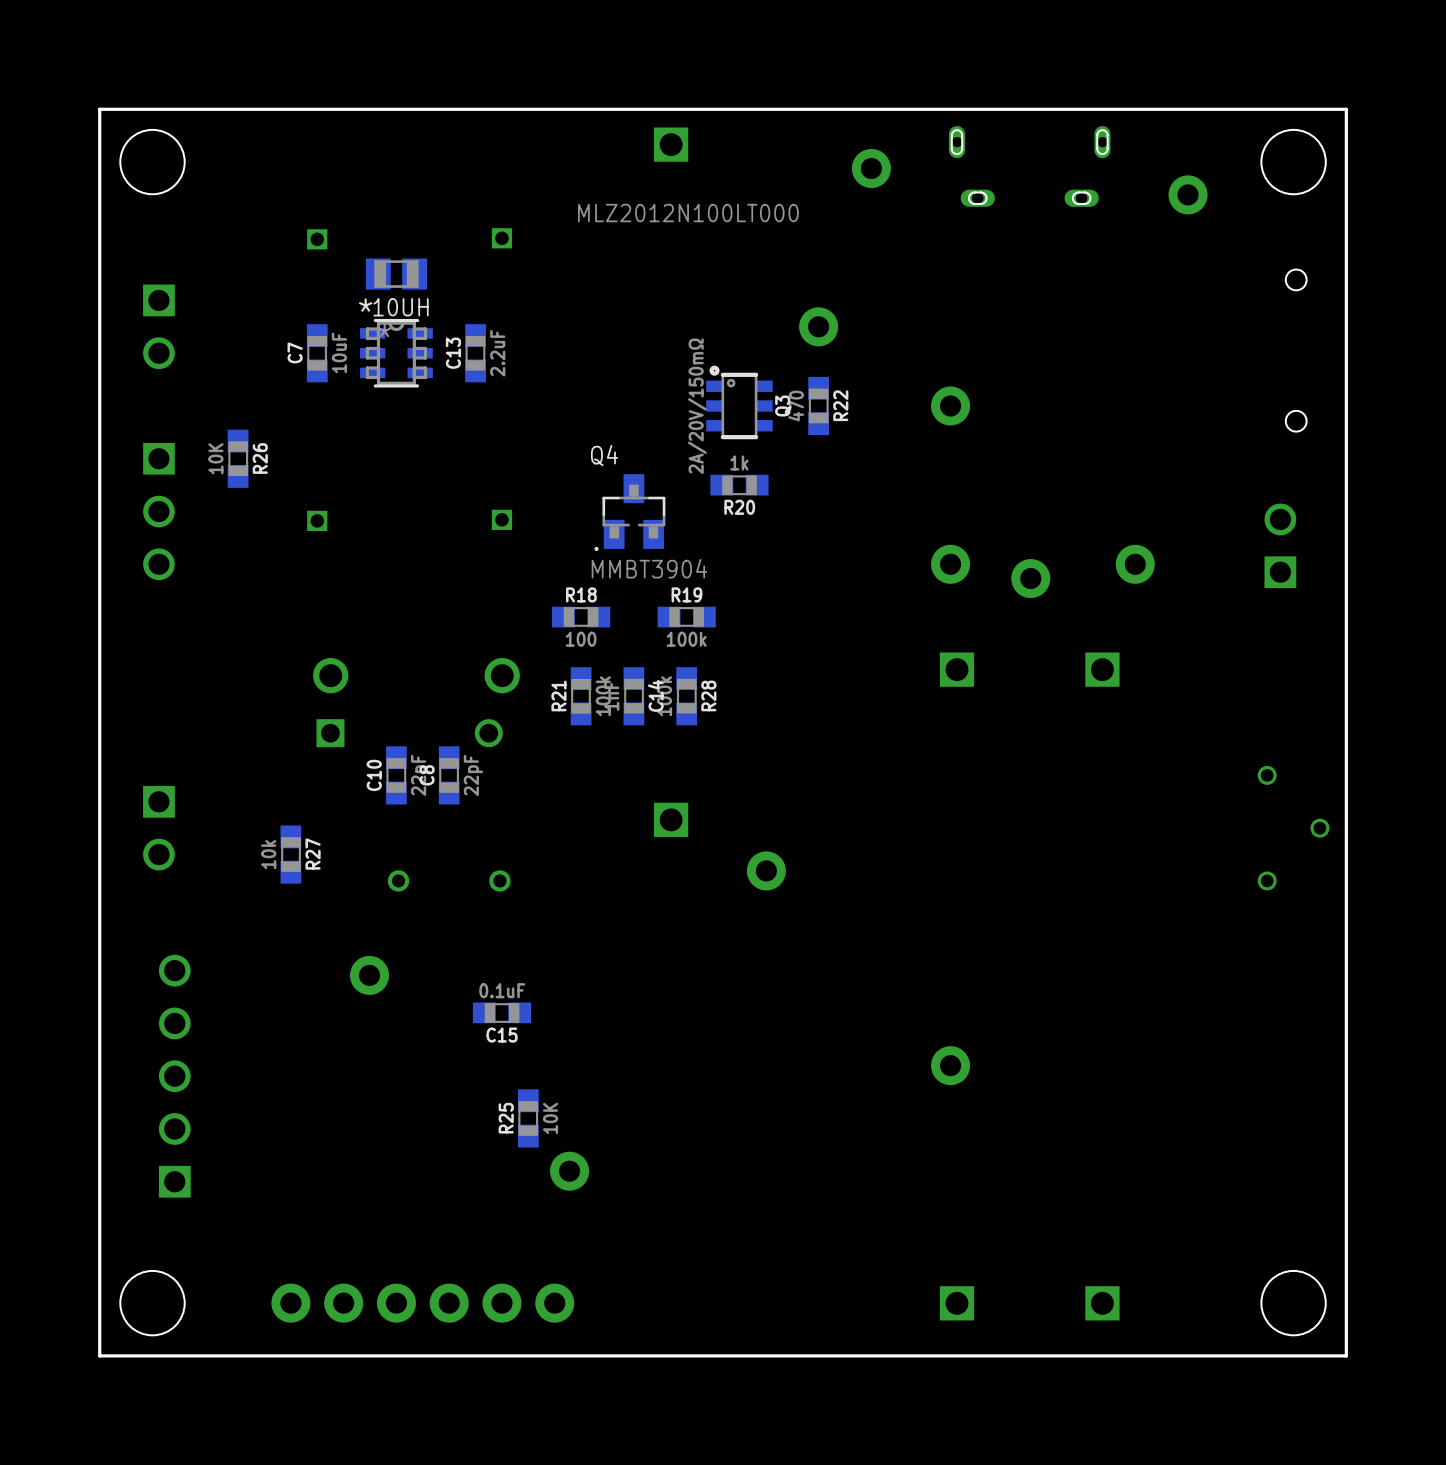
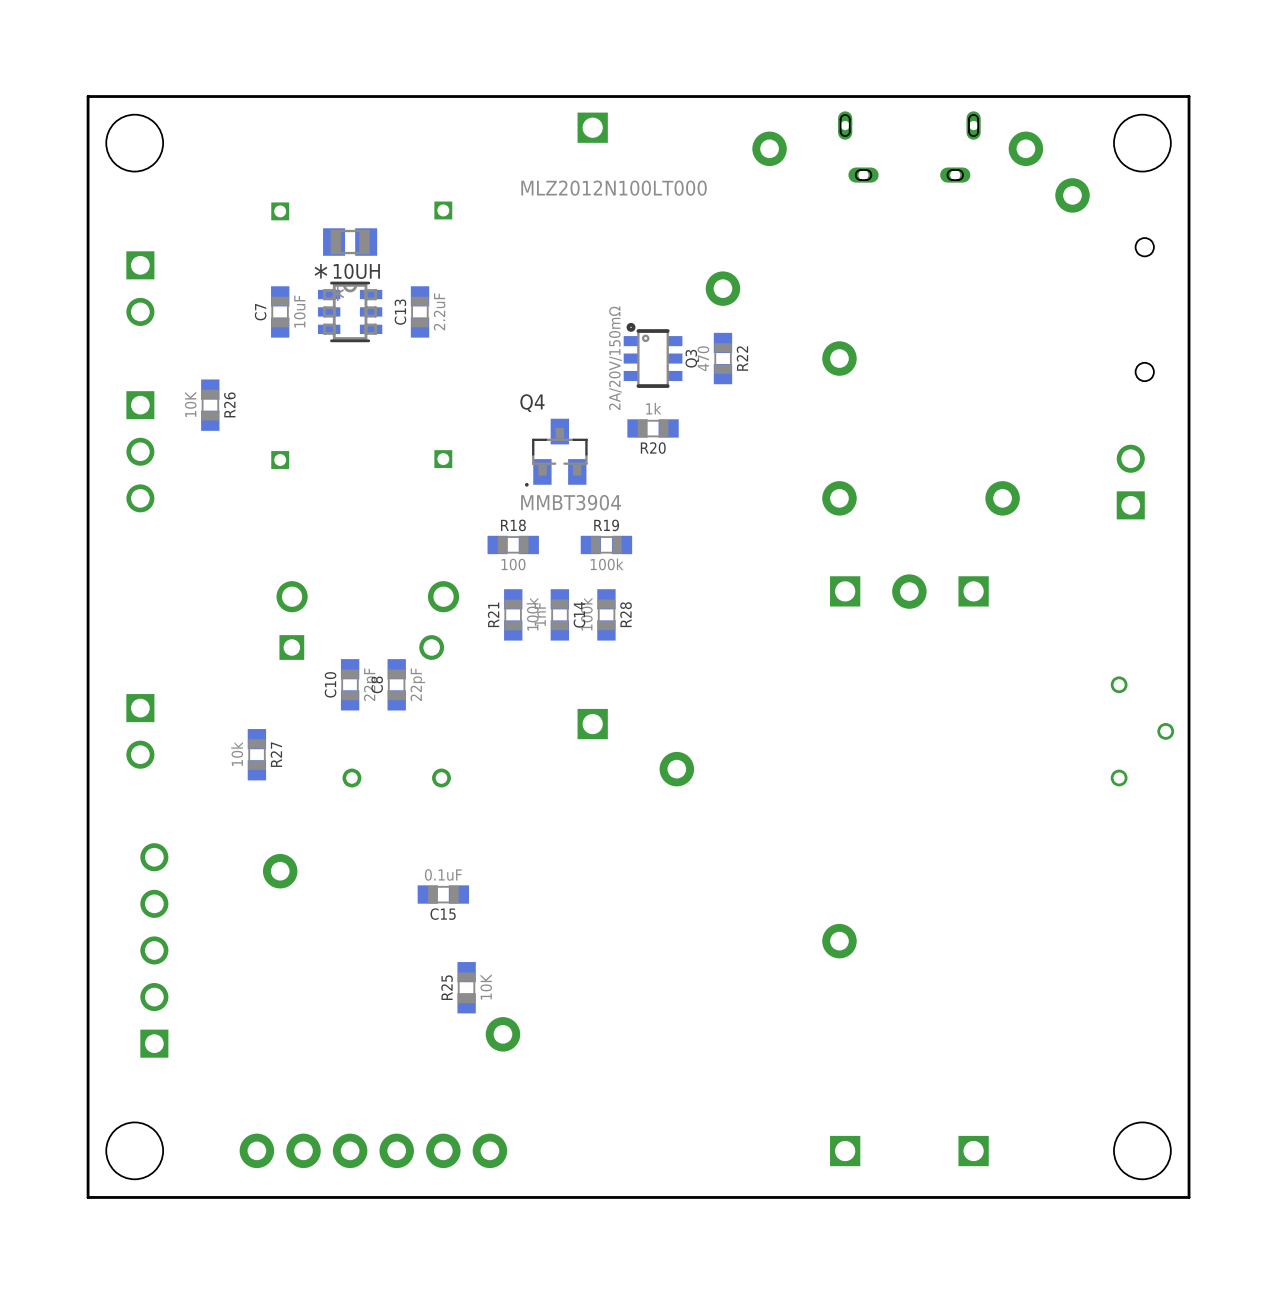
part: none -> (1025, 148)
part: (1188, 194) -> none
part: none -> (1072, 195)
part position: (1030, 578) -> (909, 591)
part position: (369, 975) -> (280, 871)

